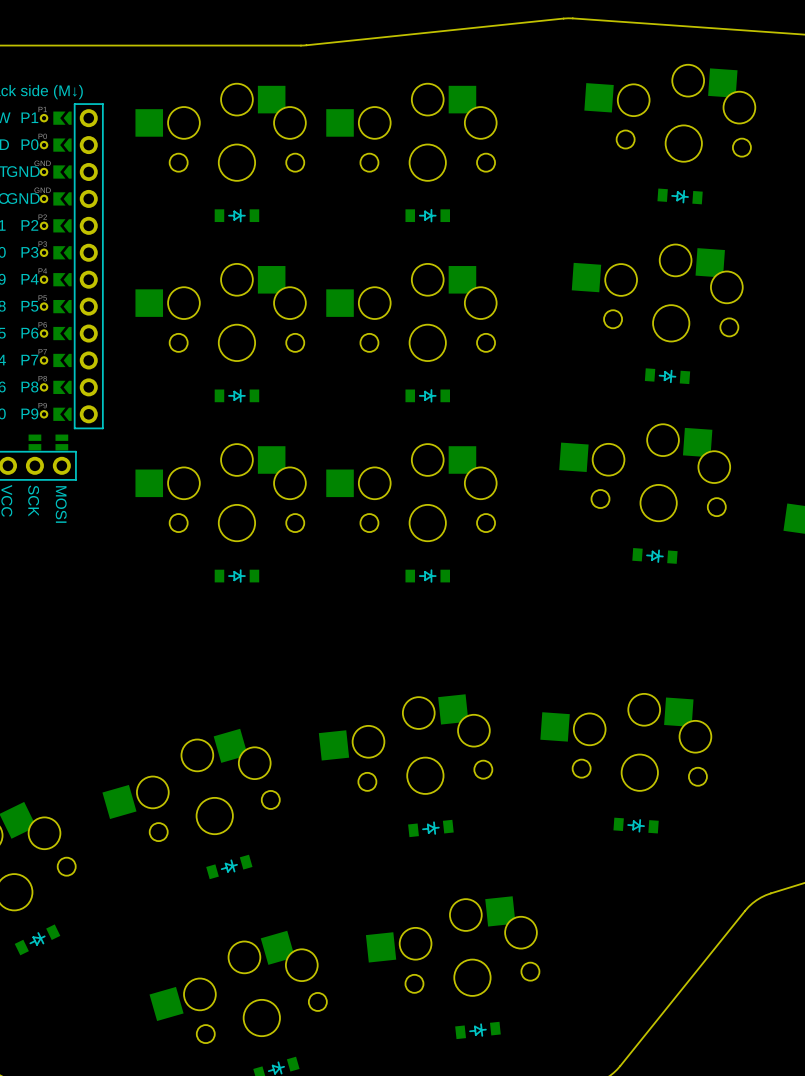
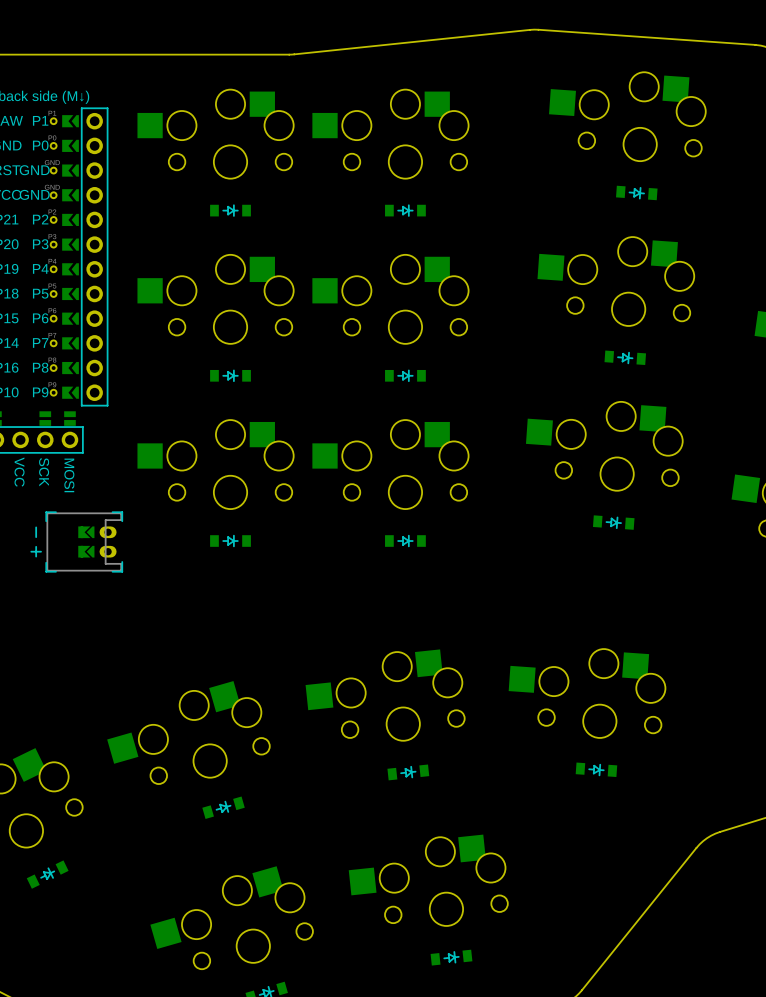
part: none -> (76, 541)

